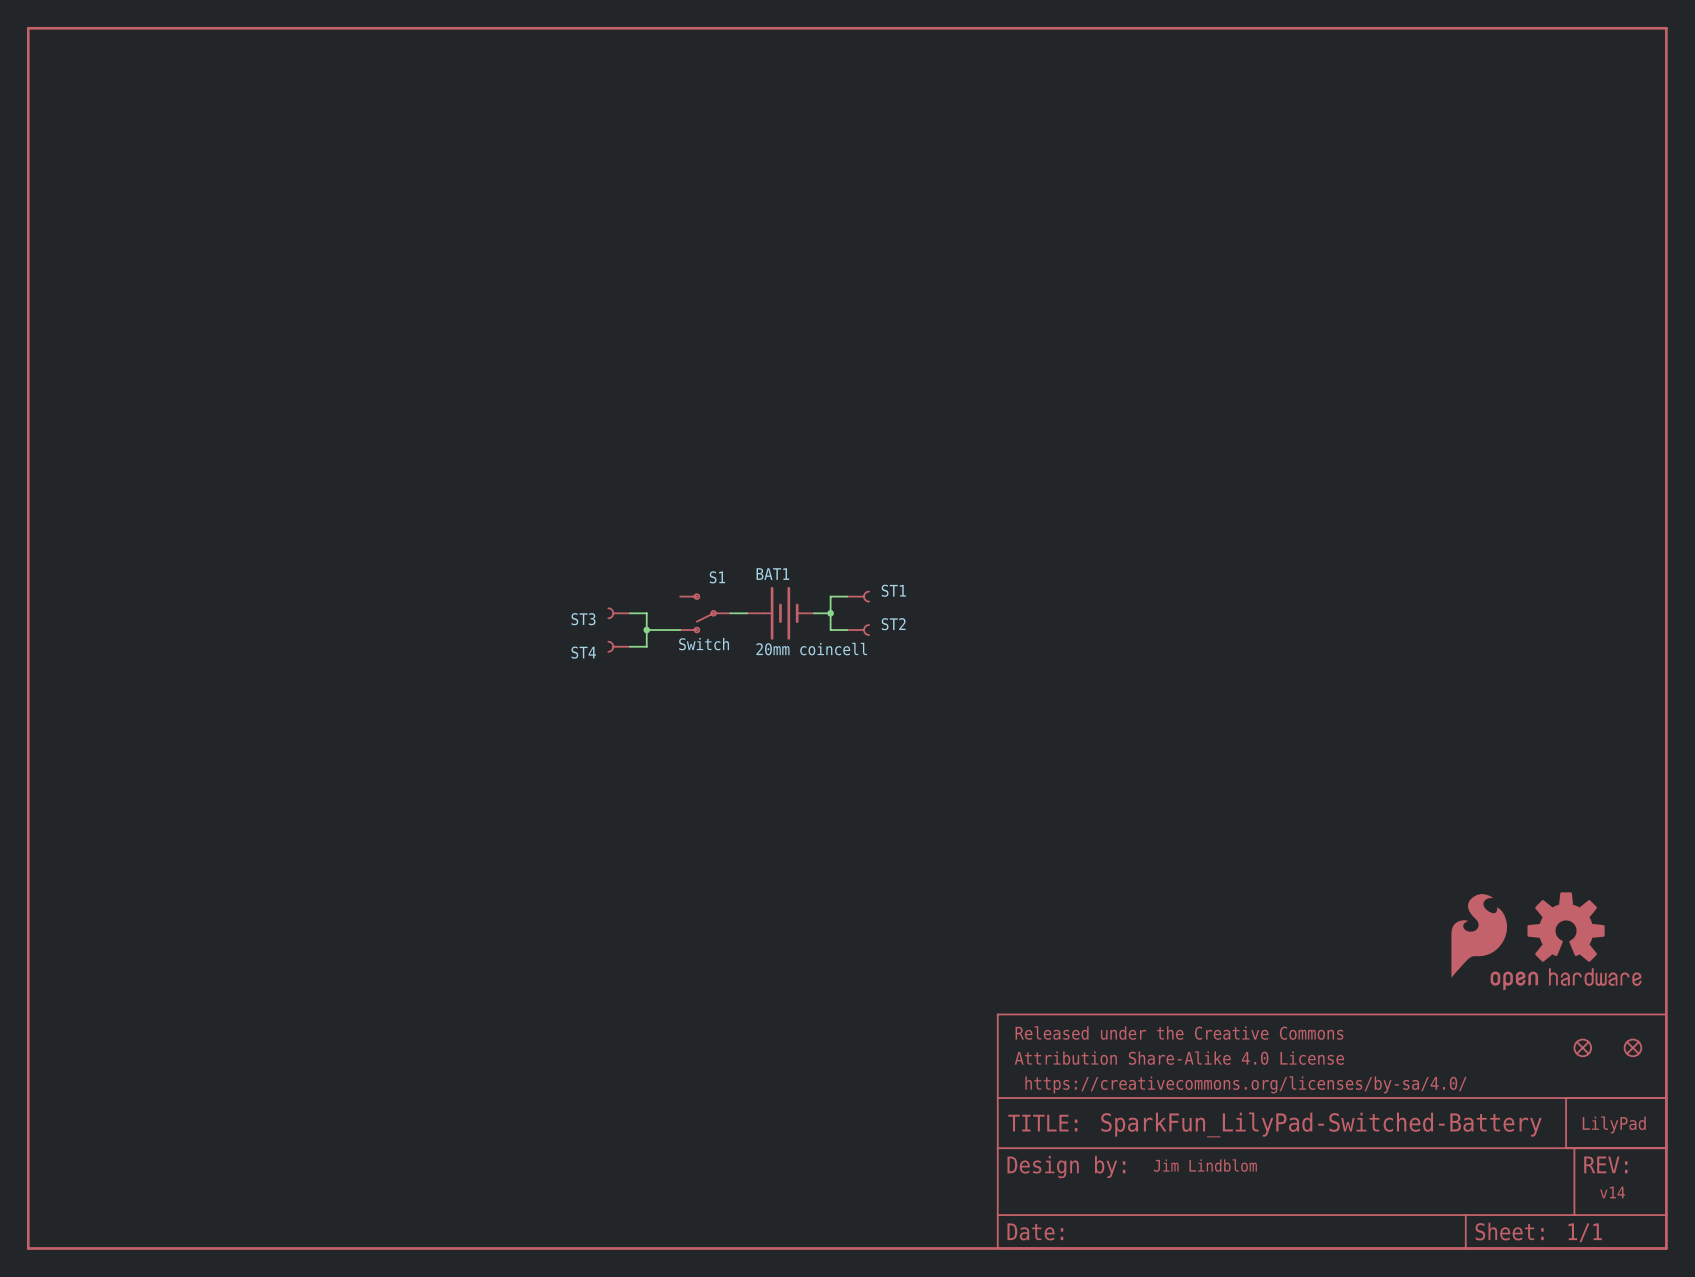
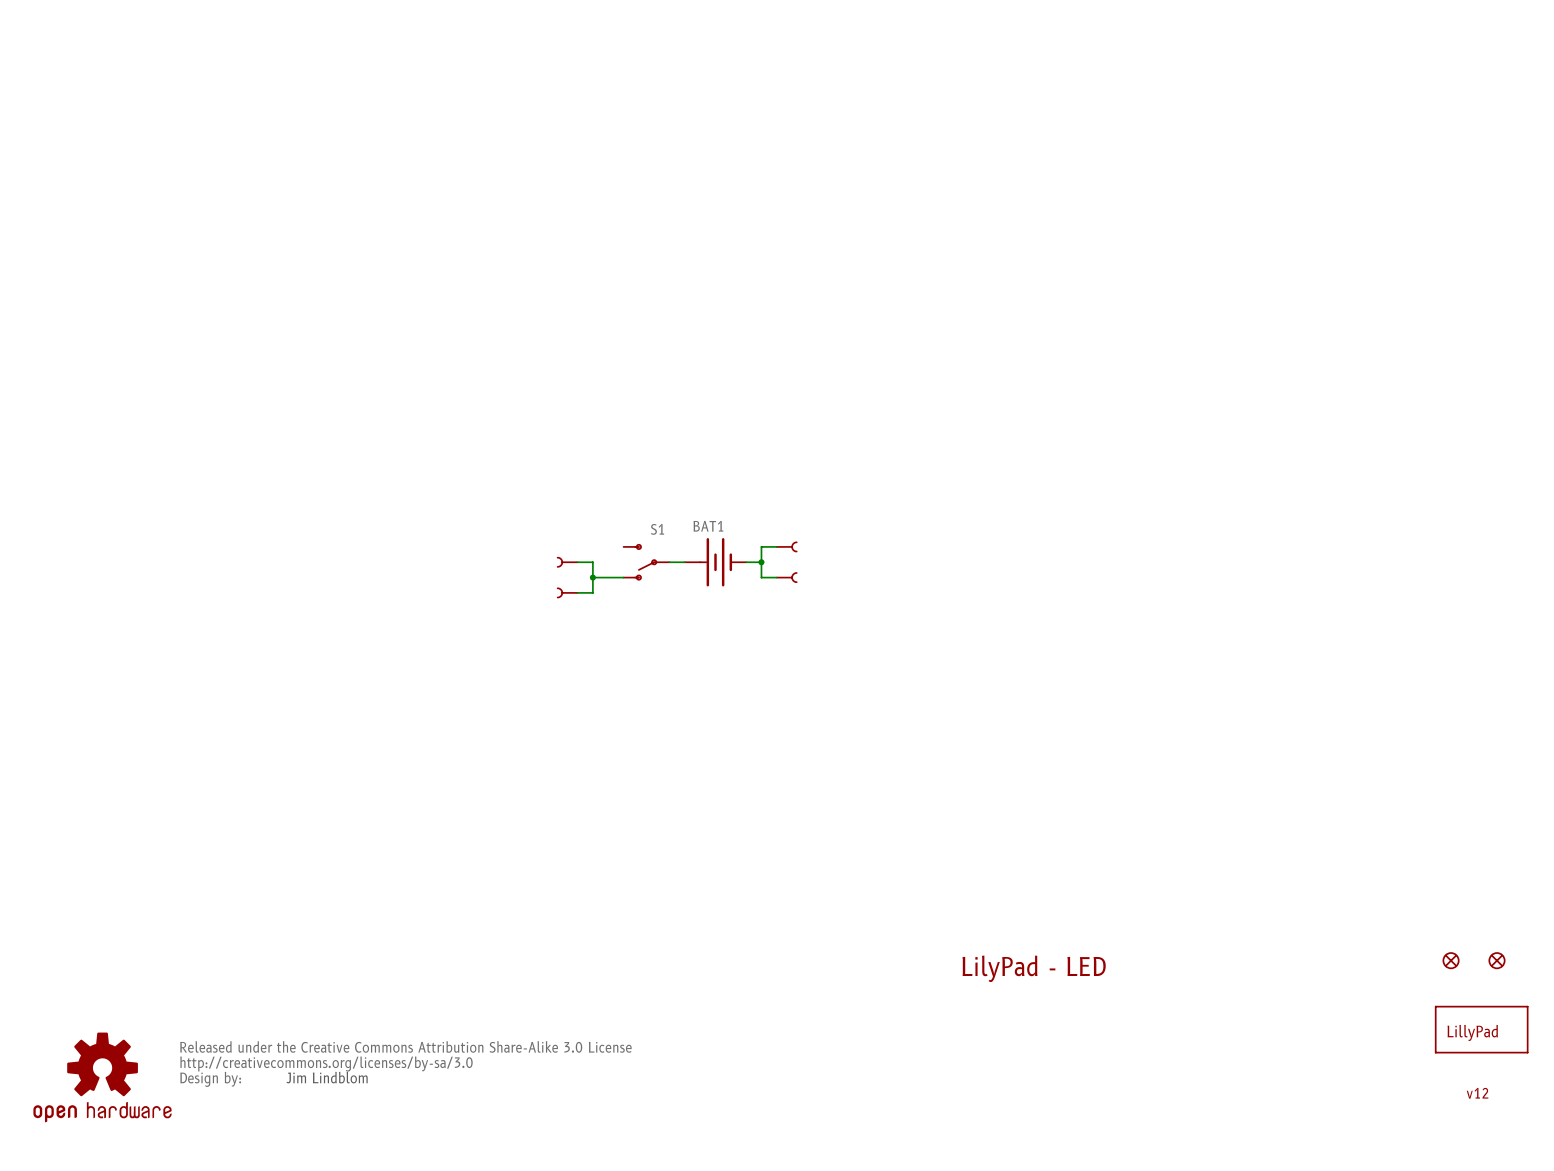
ST1 name: ST1 (893, 590) -> none
ST3 name: ST3 (583, 619) -> none
ST2 name: ST2 (893, 624) -> none
part: (847, 638) -> none
S1 value: Switch (704, 644) -> none
BAT1 value: 20mm coincell (811, 649) -> none
ST4 name: ST4 (583, 652) -> none
part: (1479, 935) -> none
part: (1566, 941) -> none
text: none -> LilyPad - LED (1034, 968)
part text: LilyPad (1614, 1124) -> none
part text: none -> LillyPad (1472, 1032)
part: (1332, 1131) -> none
part: none -> (405, 1064)
text: Jim Lindblom (1205, 1165) -> none
part: none -> (102, 1077)
text: none -> Jim Lindblom (327, 1077)
text: v14 (1612, 1192) -> v12 (1477, 1093)

